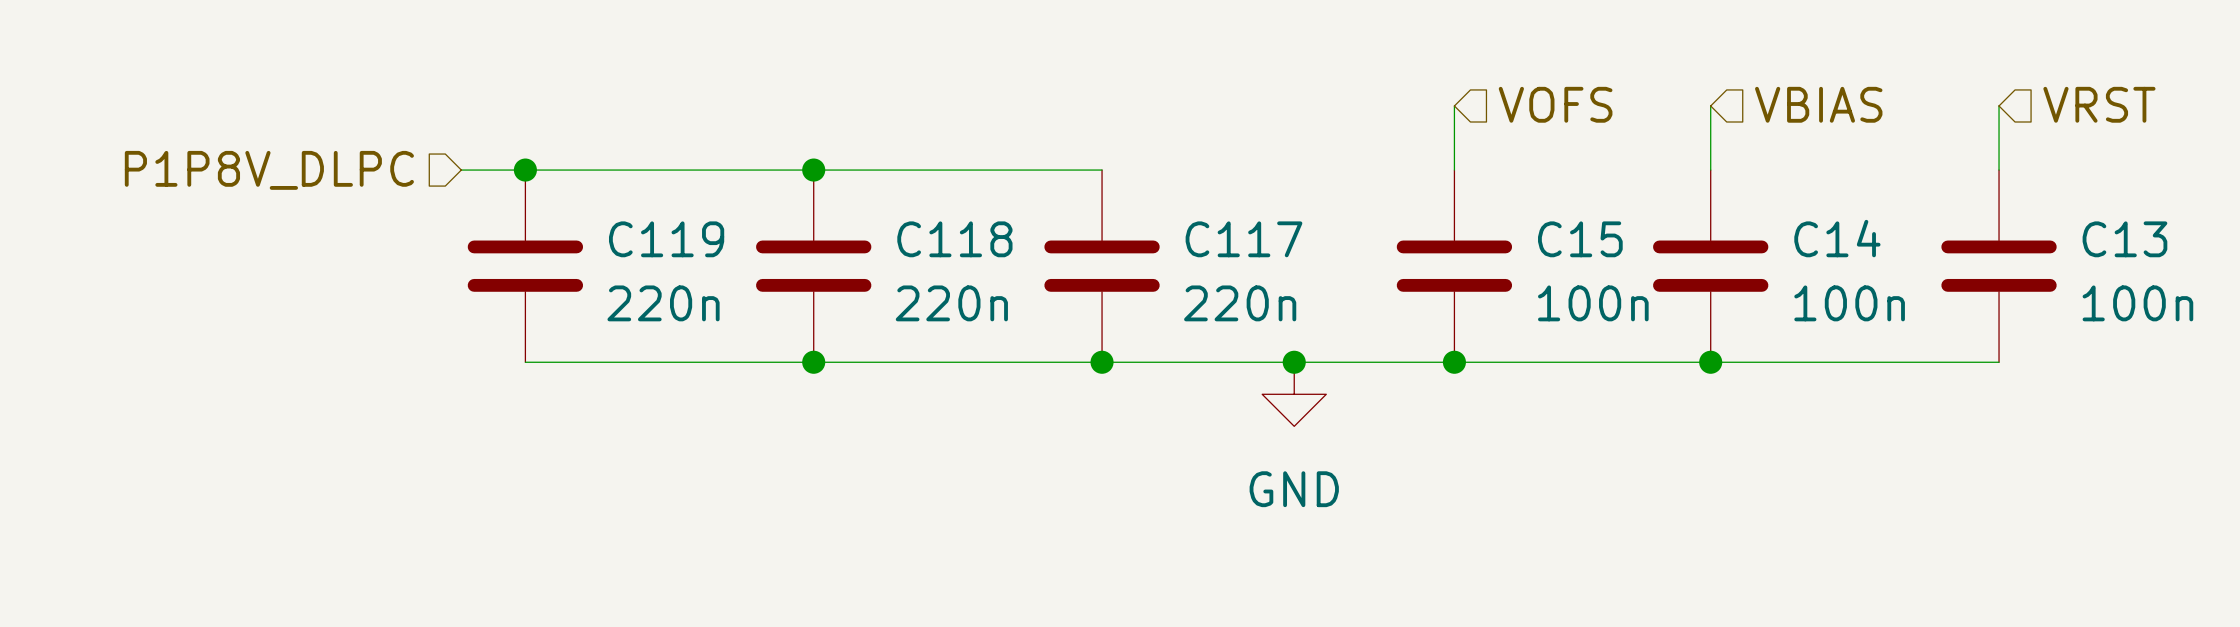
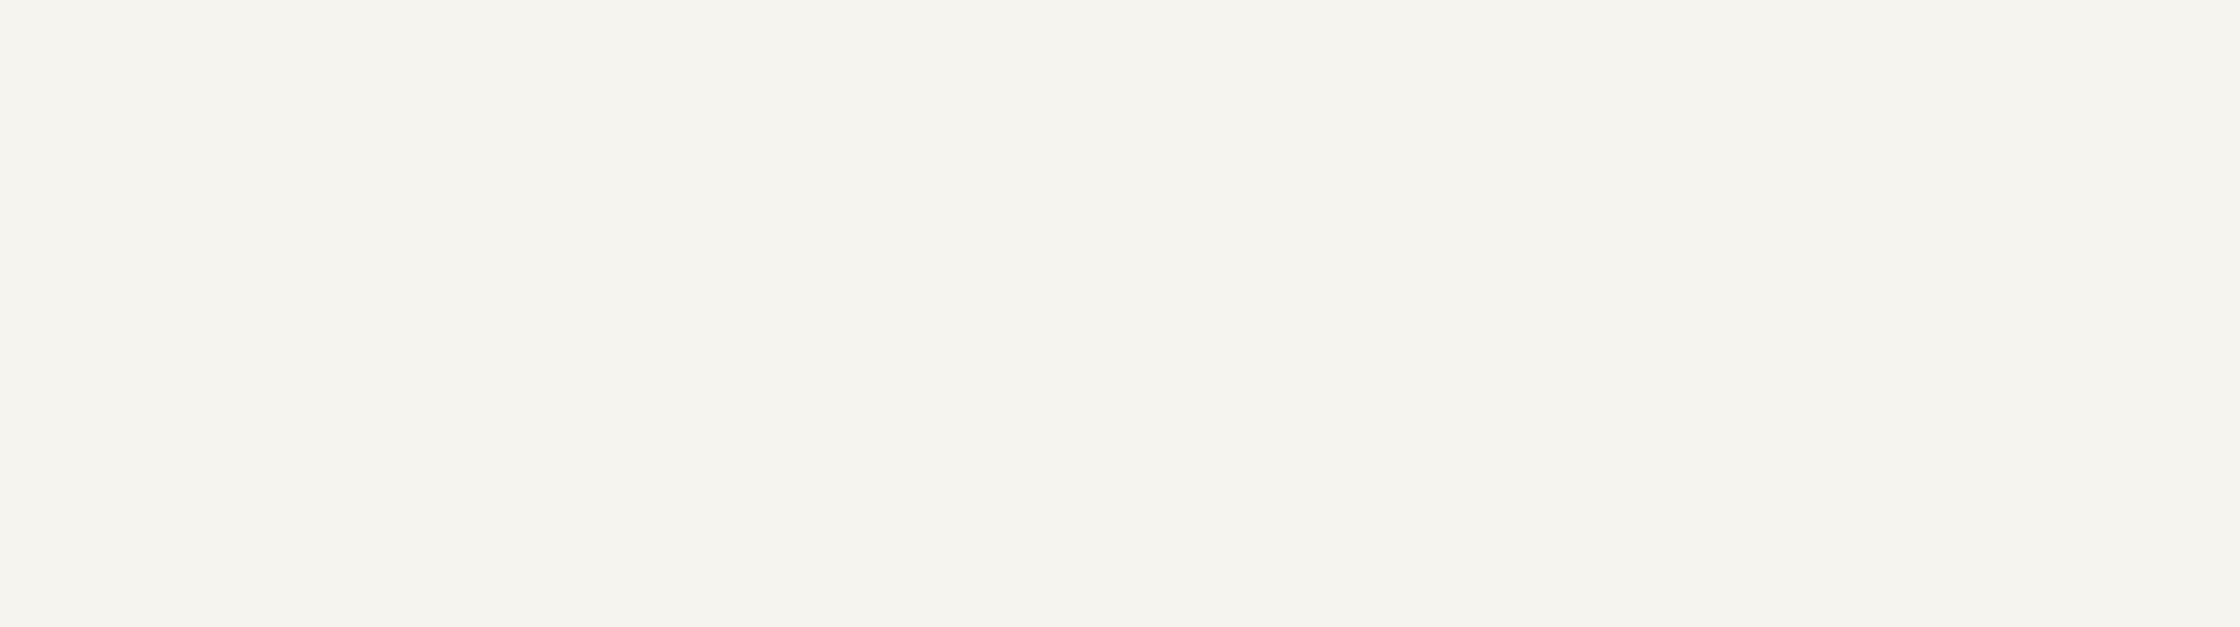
hierarchical label: VOFS (1555, 104) -> none
hierarchical label: VBIAS (1818, 104) -> none
hierarchical label: VRST (2099, 104) -> none
wire: (1454, 105) (1454, 170) -> none
wire: (1710, 105) (1710, 170) -> none
wire: (1999, 105) (1999, 170) -> none
hierarchical label: P1P8V_DLPC (269, 170) -> none
wire: (461, 170) (1102, 170) -> none
junction: (525, 170) -> none
junction: (813, 170) -> none
C119: 220n (525, 266) -> none
C118: 220n (813, 266) -> none
C117: 220n (1102, 266) -> none
C15: 100n (1454, 266) -> none
C14: 100n (1710, 266) -> none
C13: 100n (1999, 266) -> none
wire: (525, 362) (1999, 362) -> none
junction: (813, 362) -> none
junction: (1102, 362) -> none
junction: (1294, 362) -> none
junction: (1454, 362) -> none
junction: (1710, 362) -> none
power symbol: GND (1294, 394) -> none

